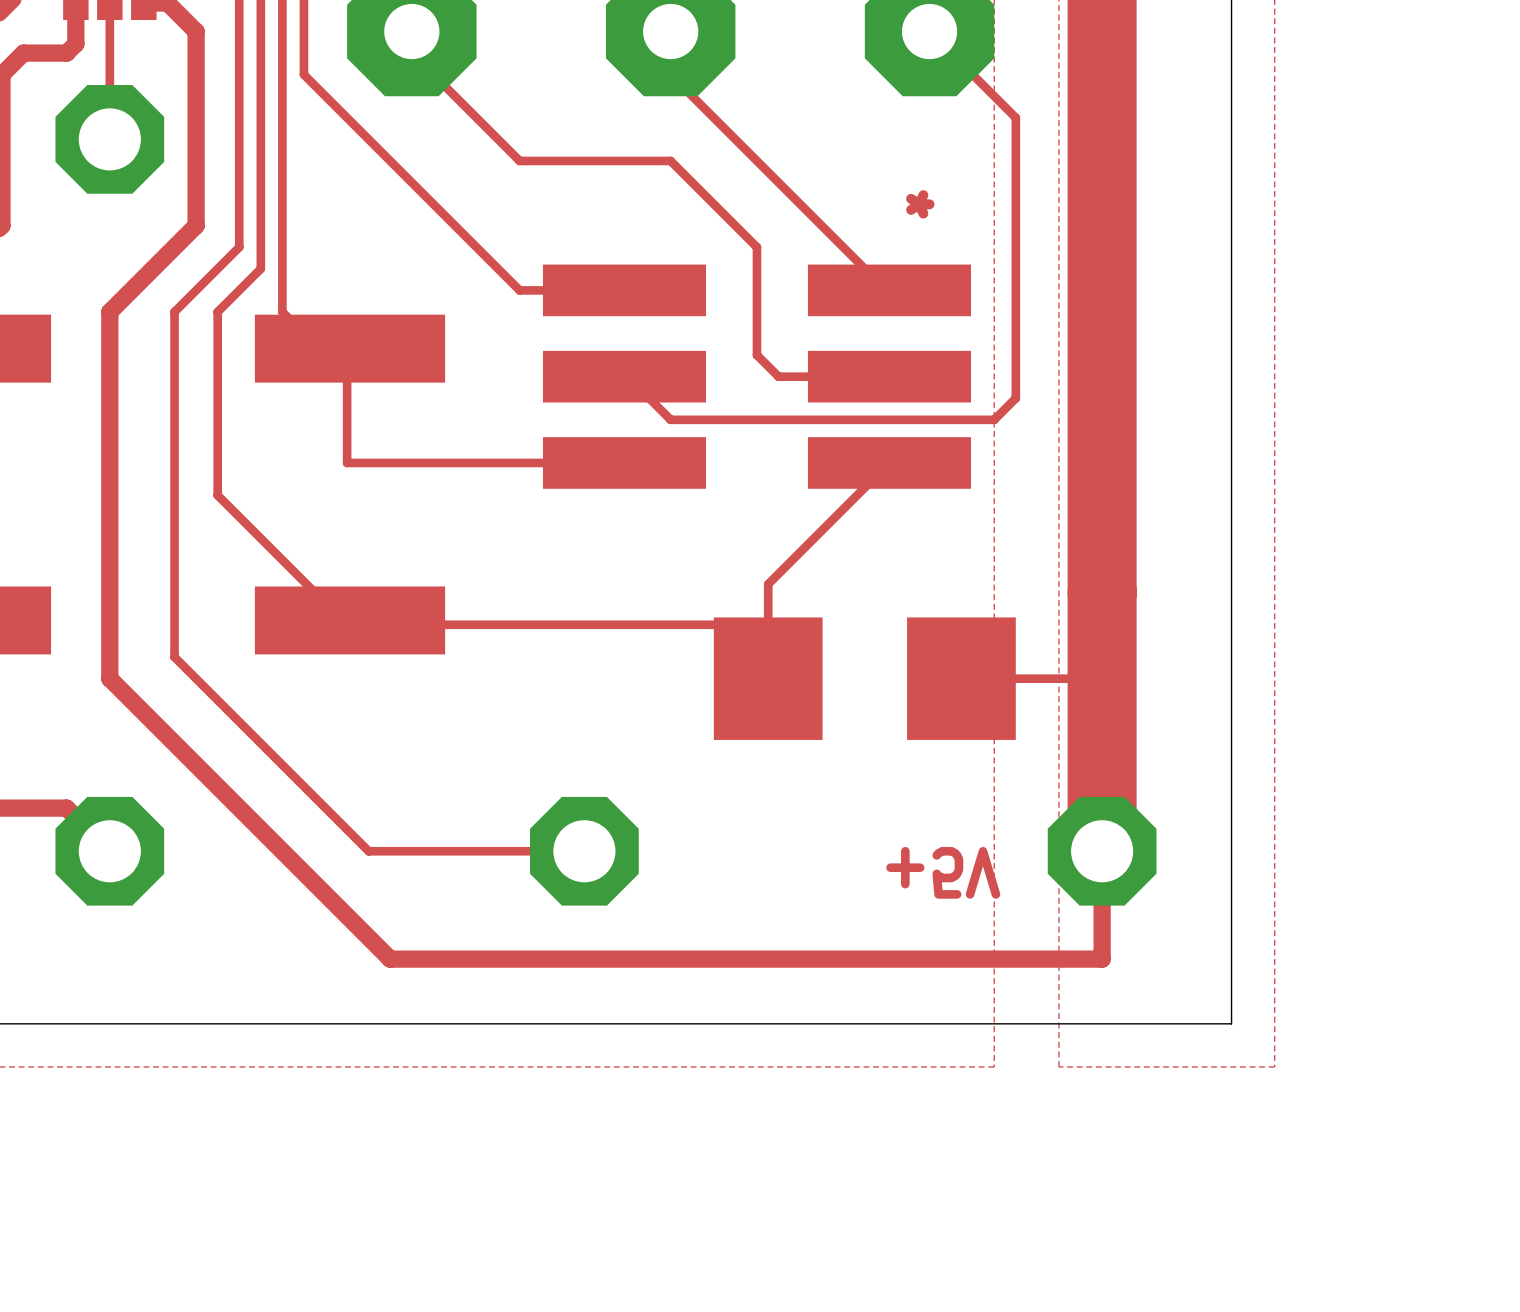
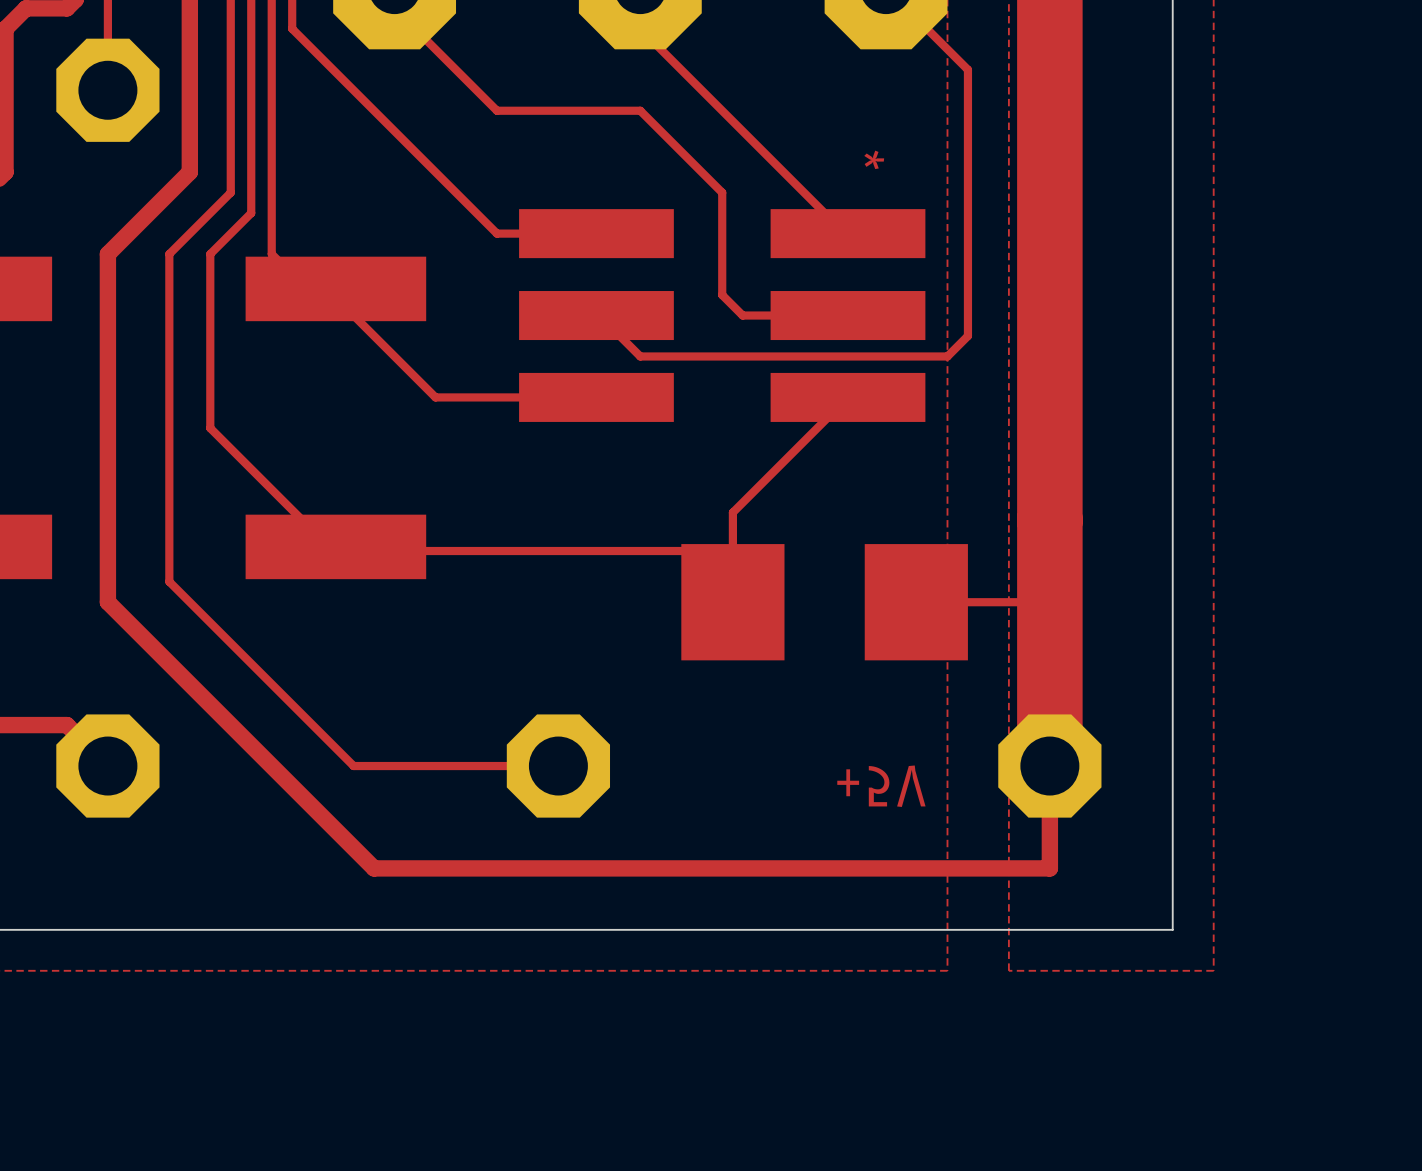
top track: (347, 355) (347, 462) (454, 462) -> (333, 295) (435, 397)

